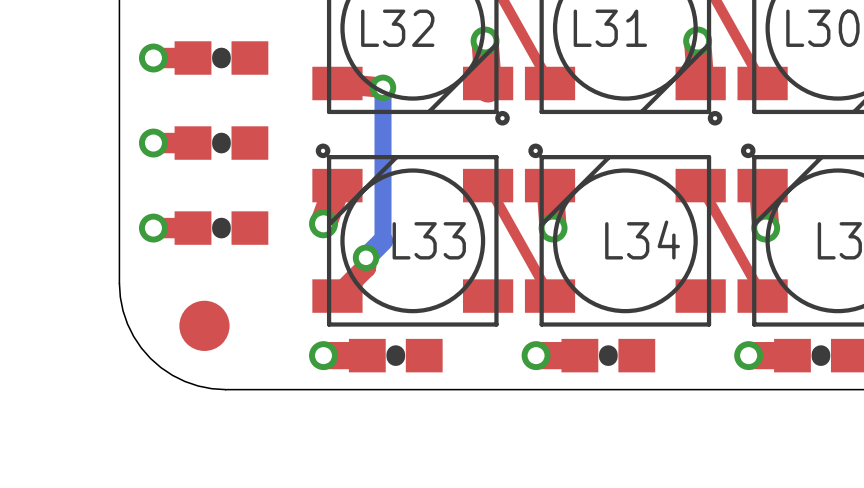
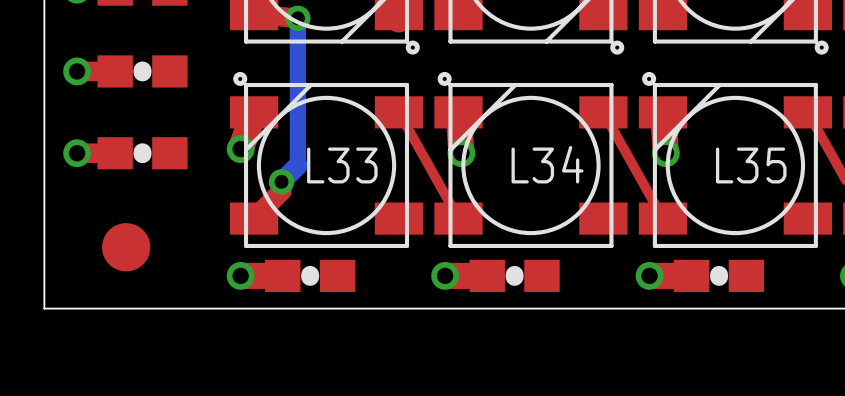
board edge: (119, 283) (123, 310) (127, 324) (133, 336) (150, 358) (172, 375) (185, 381) (198, 386) (225, 389) -> (44, 206) (44, 308) (146, 308)

